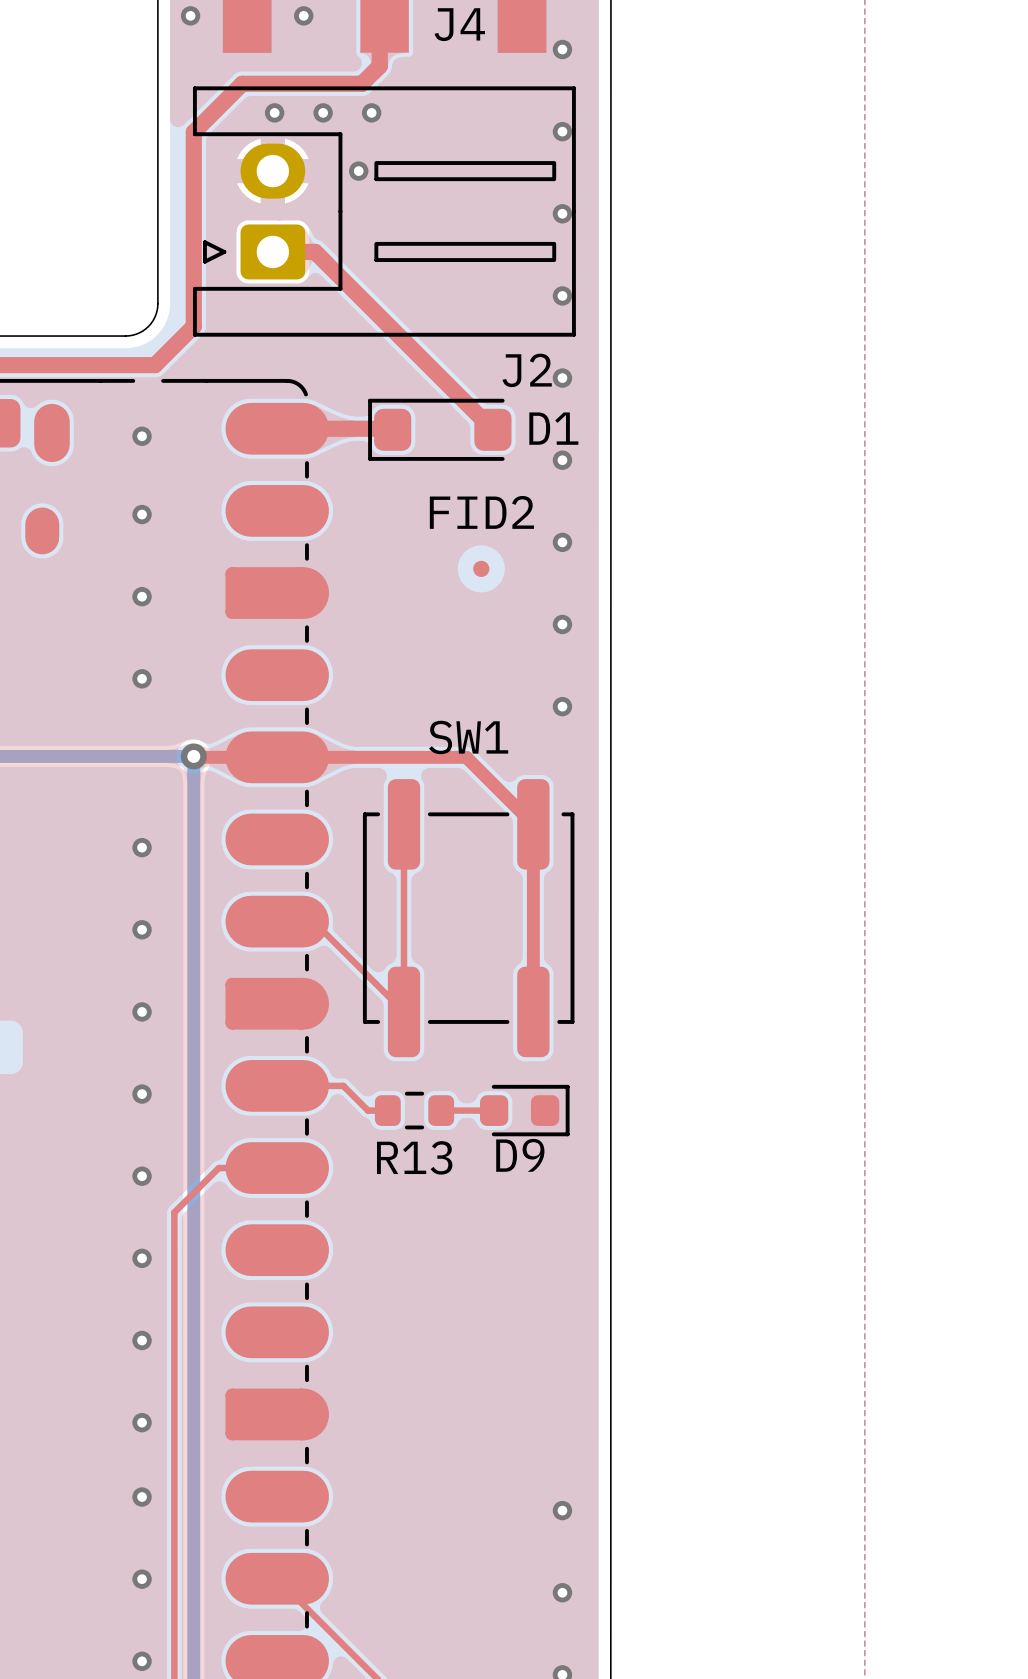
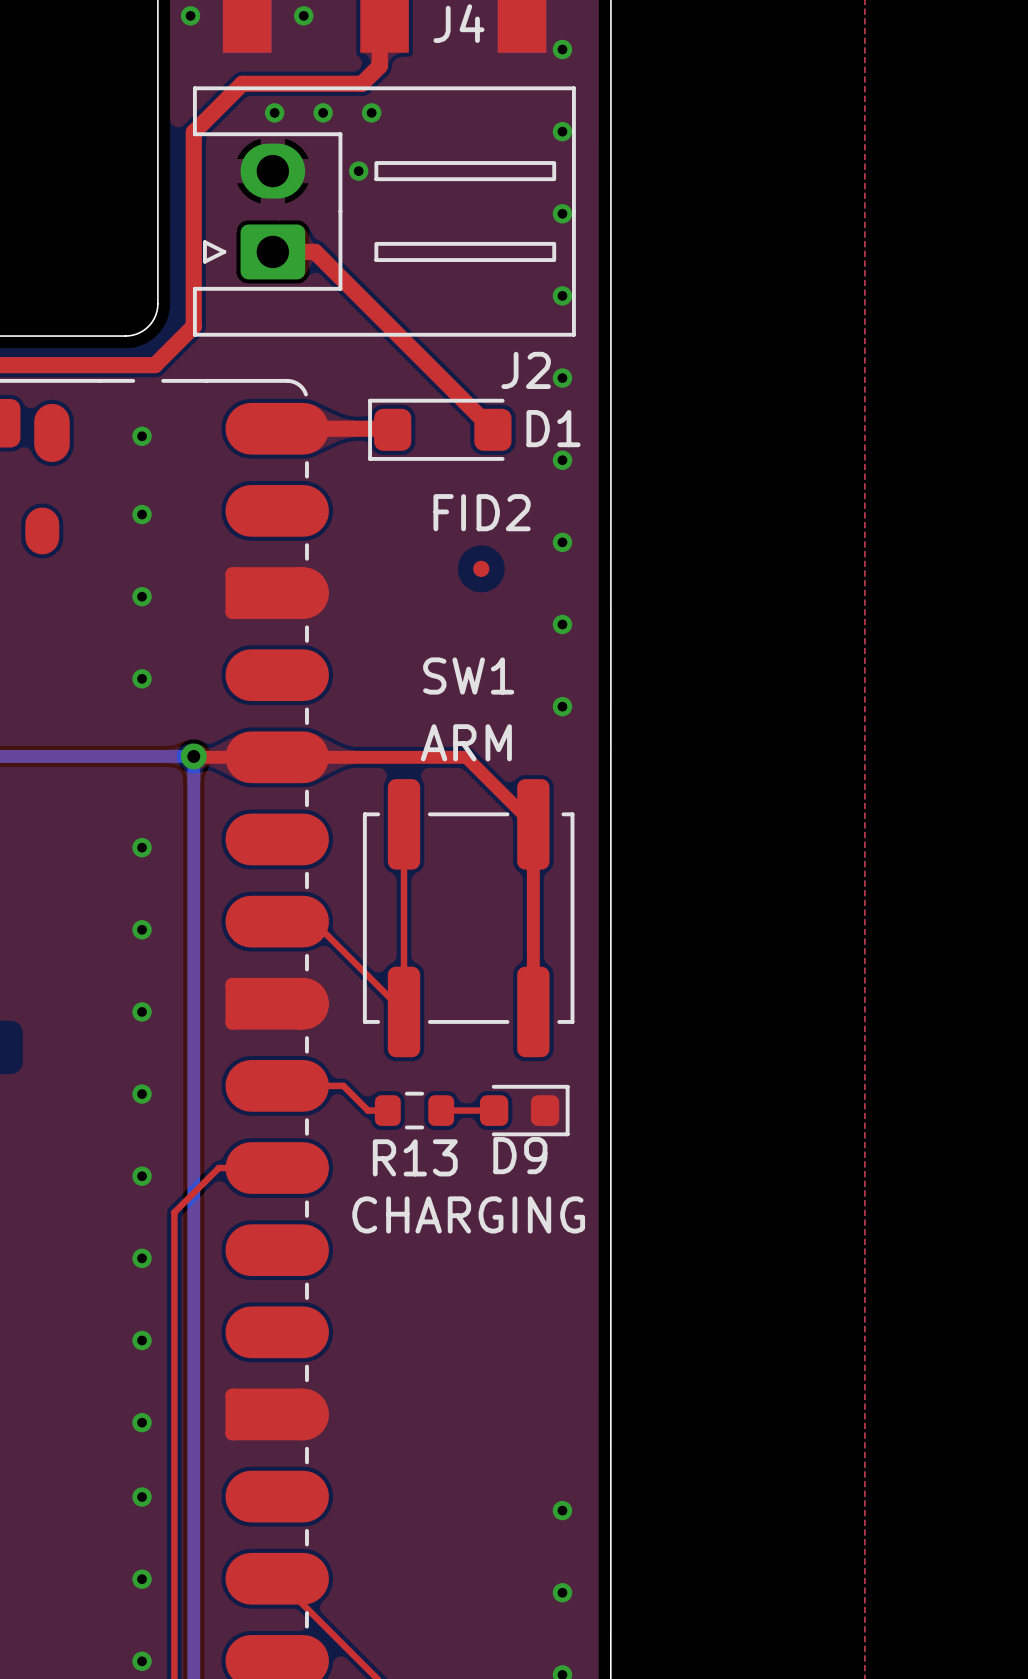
SW1 name position: SW1 (468, 737) -> SW1 (468, 676)
text: none -> ARM (466, 742)
text: none -> CHARGING (468, 1214)

